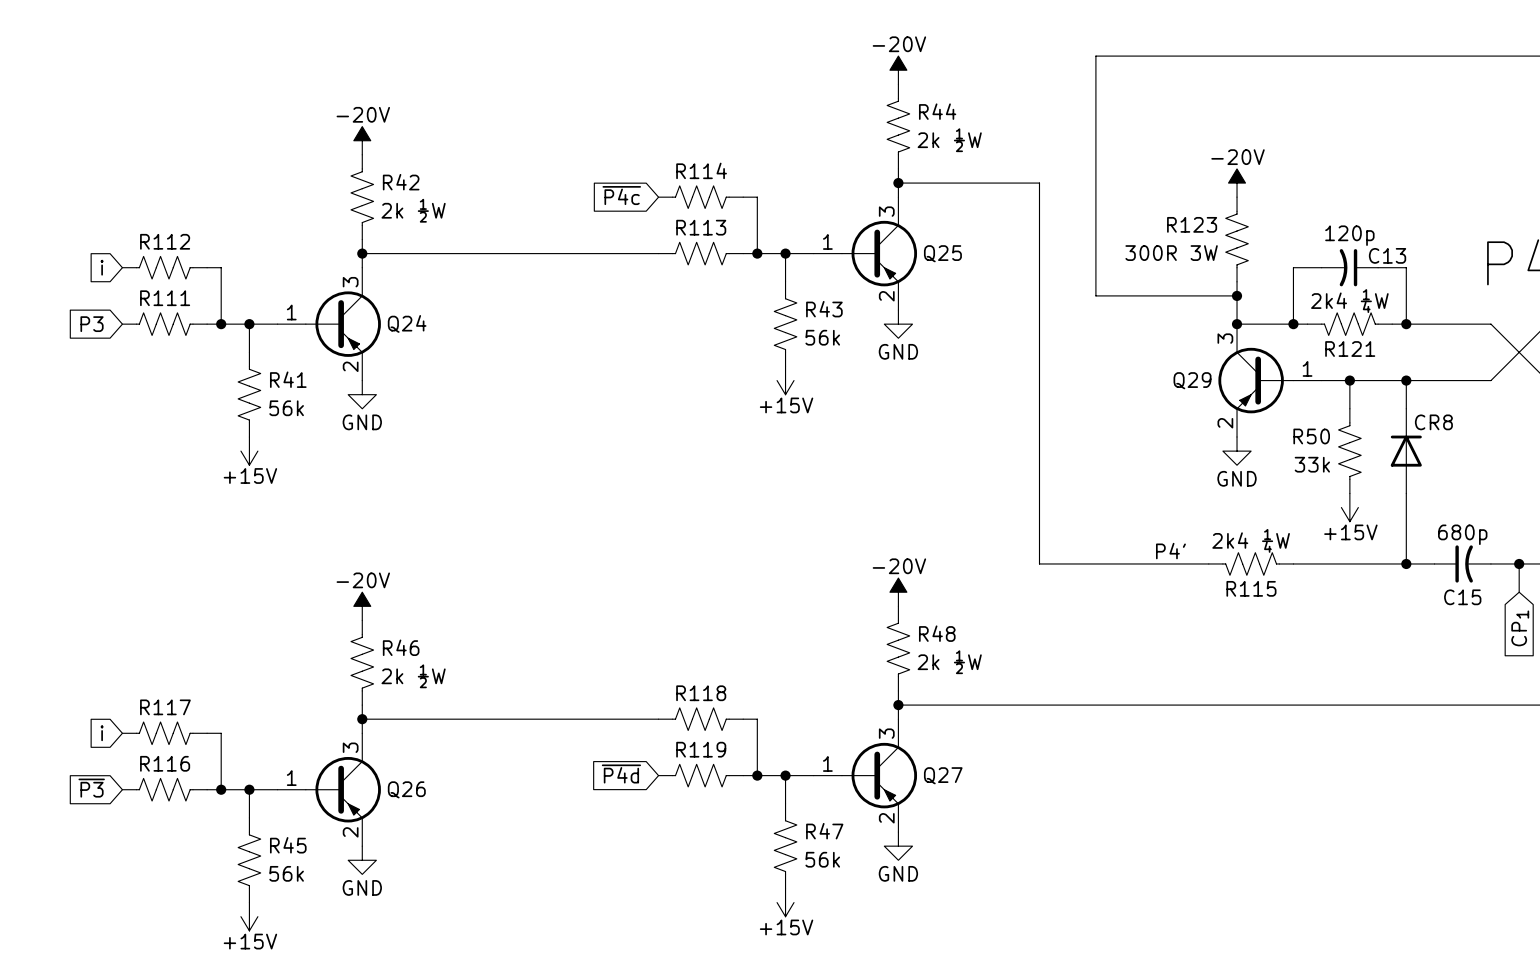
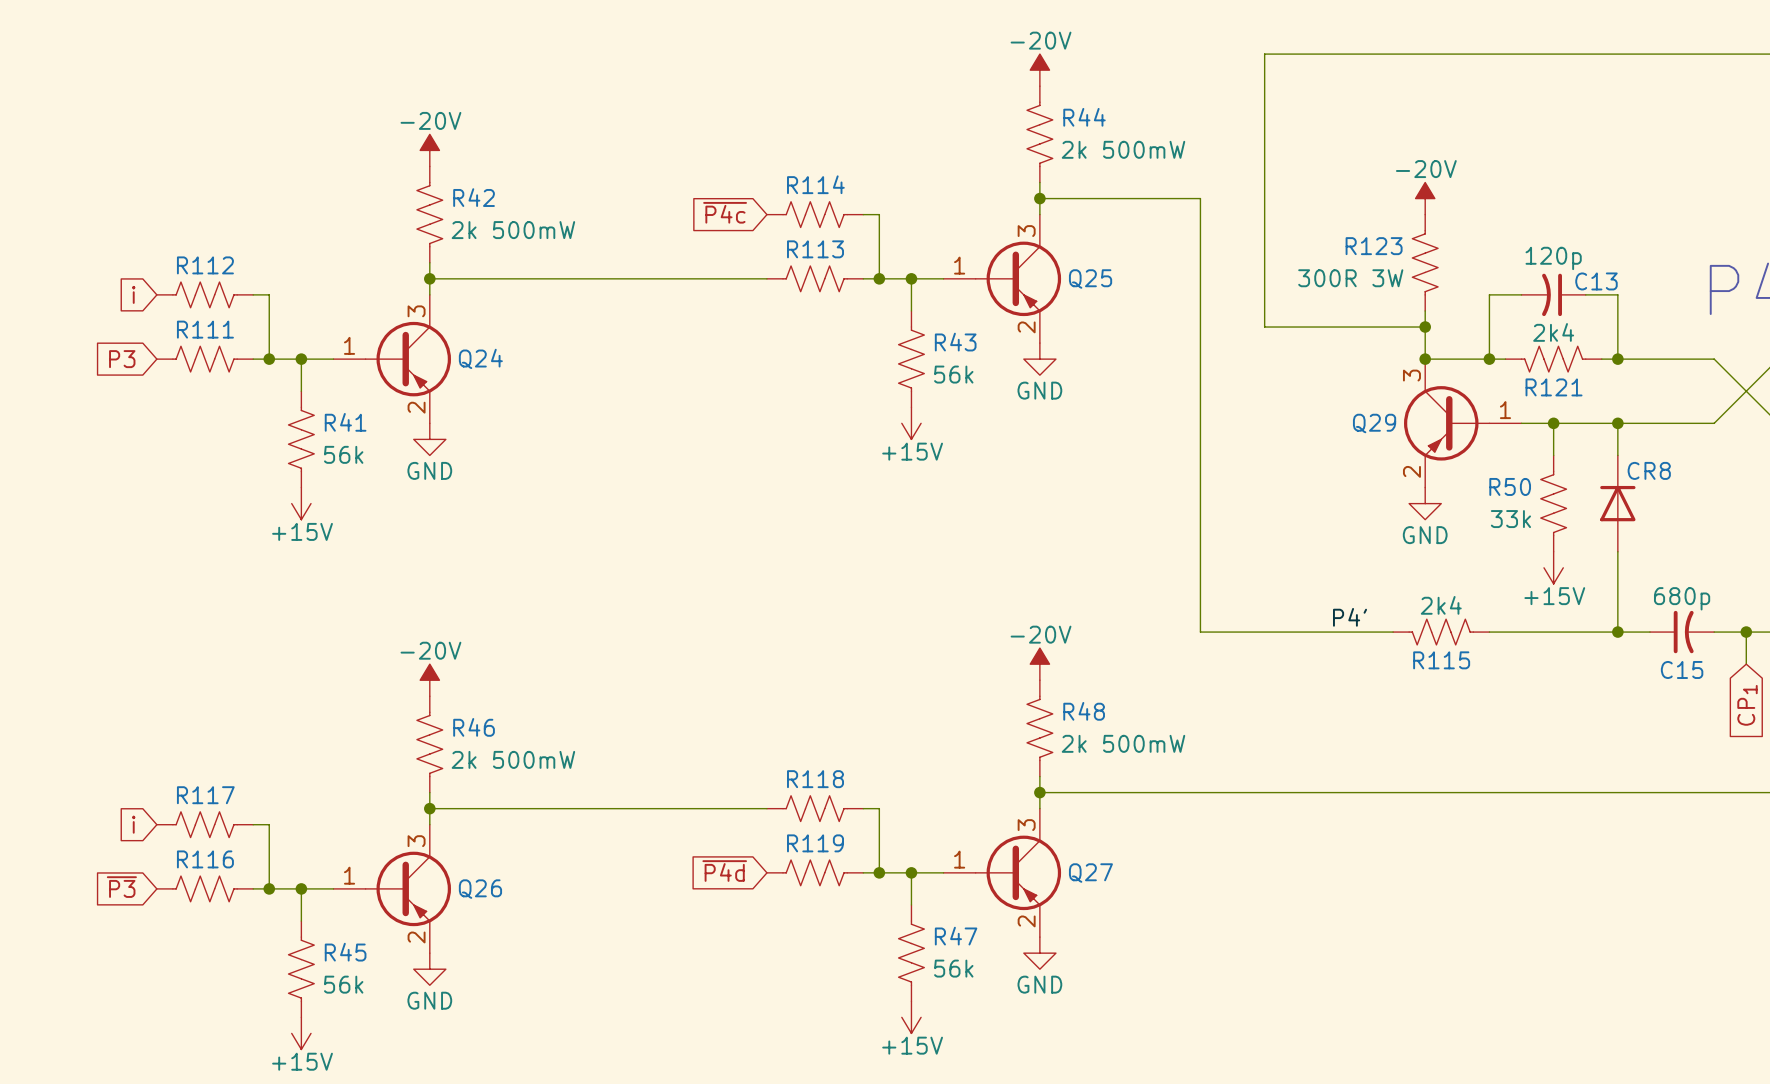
R44 value: 2k ½W (949, 140) -> 2k 500mW (1123, 149)
R42 value: 2k ½W (413, 210) -> 2k 500mW (513, 230)
R121 value: 2k4 ¼W (1349, 301) -> 2k4 (1553, 332)
R115 value: 2k4 ¼W (1251, 540) -> 2k4 (1441, 605)
R48 value: 2k ½W (949, 662) -> 2k 500mW (1123, 743)
R46 value: 2k ½W (413, 676) -> 2k 500mW (513, 759)

